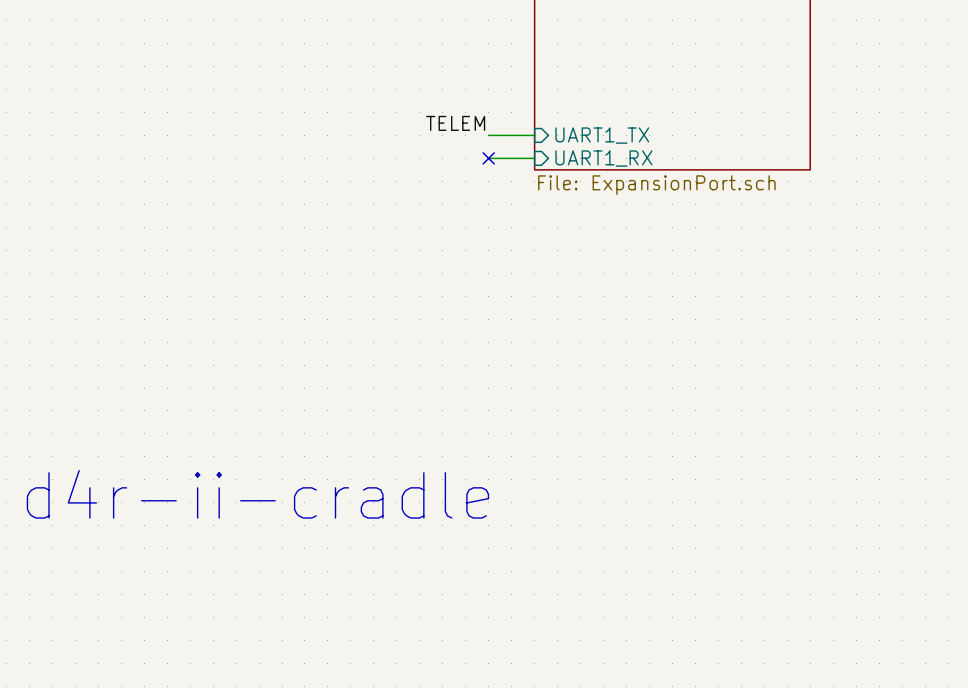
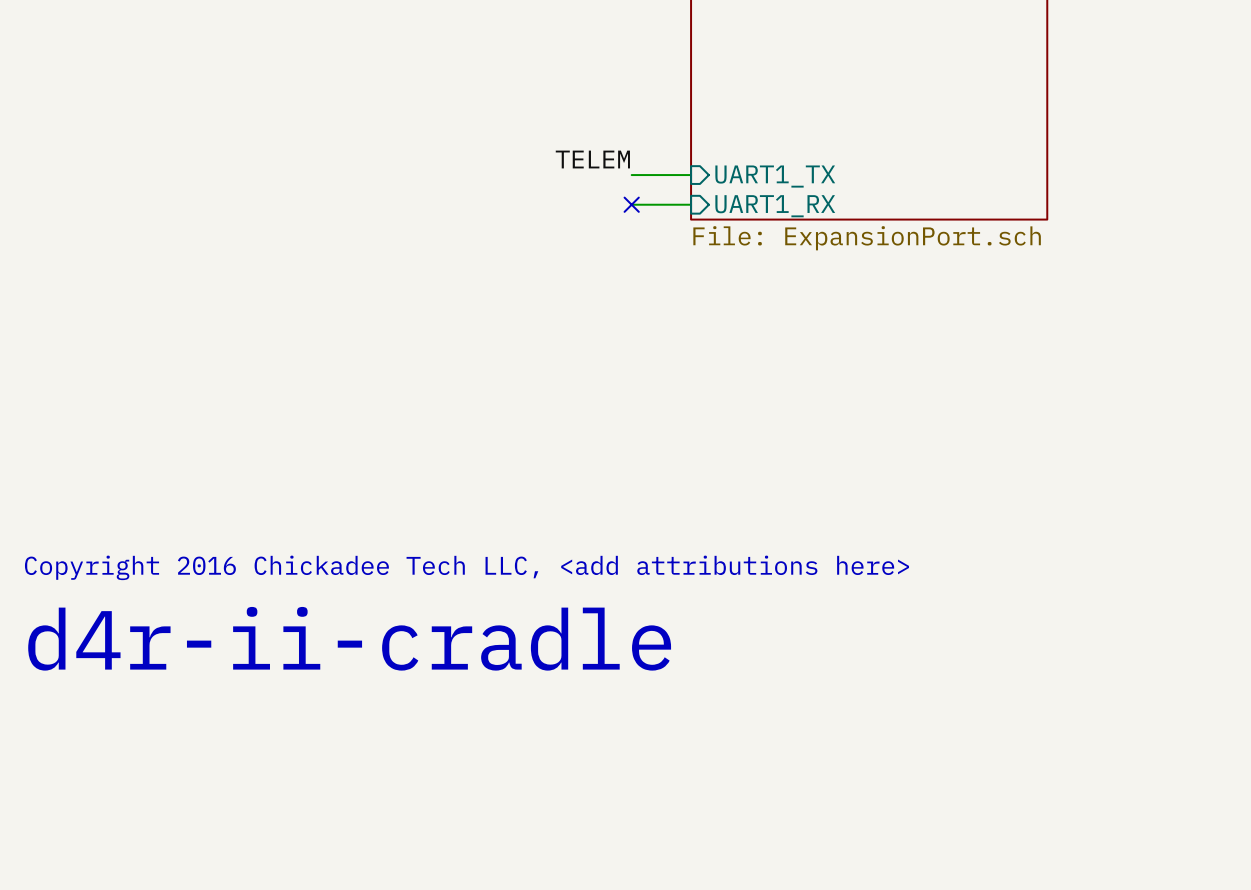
text: none -> Copyright 2016 Chickadee Tech LLC, <add attributions here> (466, 567)

